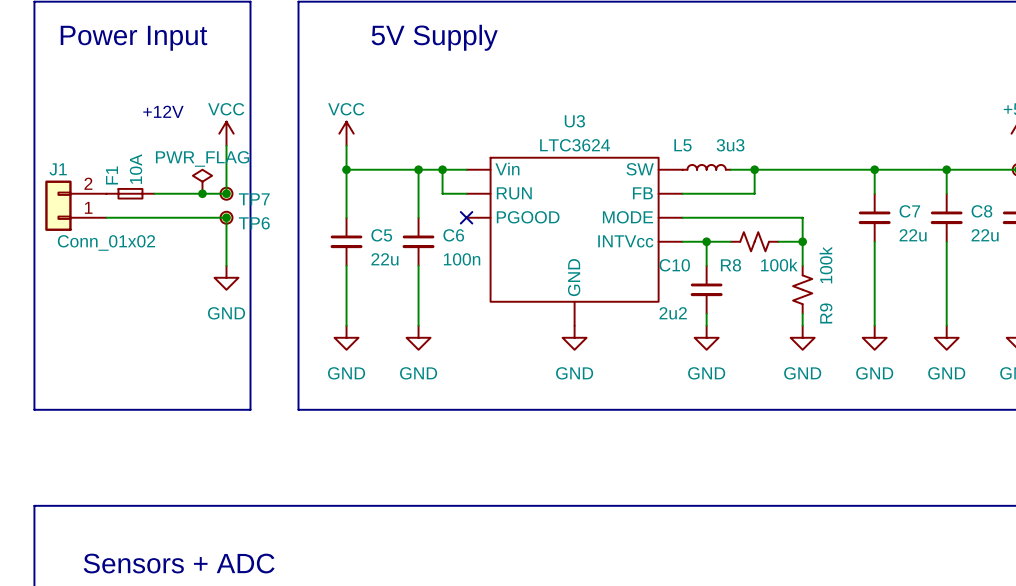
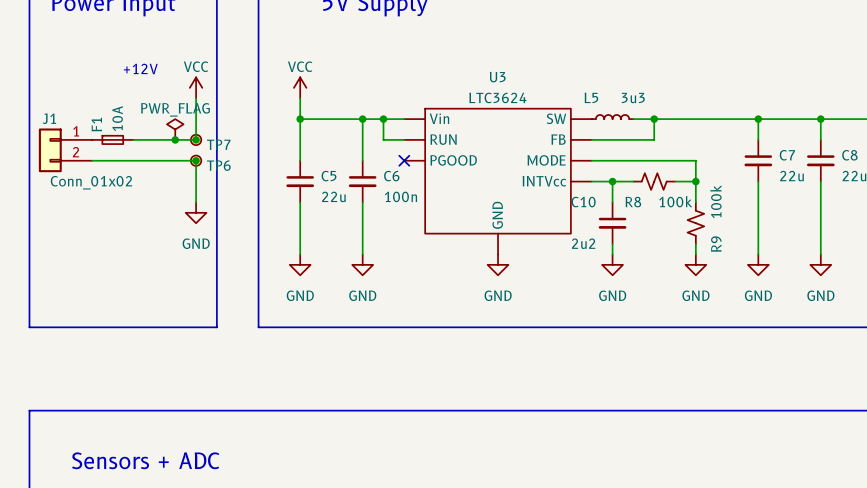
J1 flip: as is (58, 205) -> up-down (50, 150)

